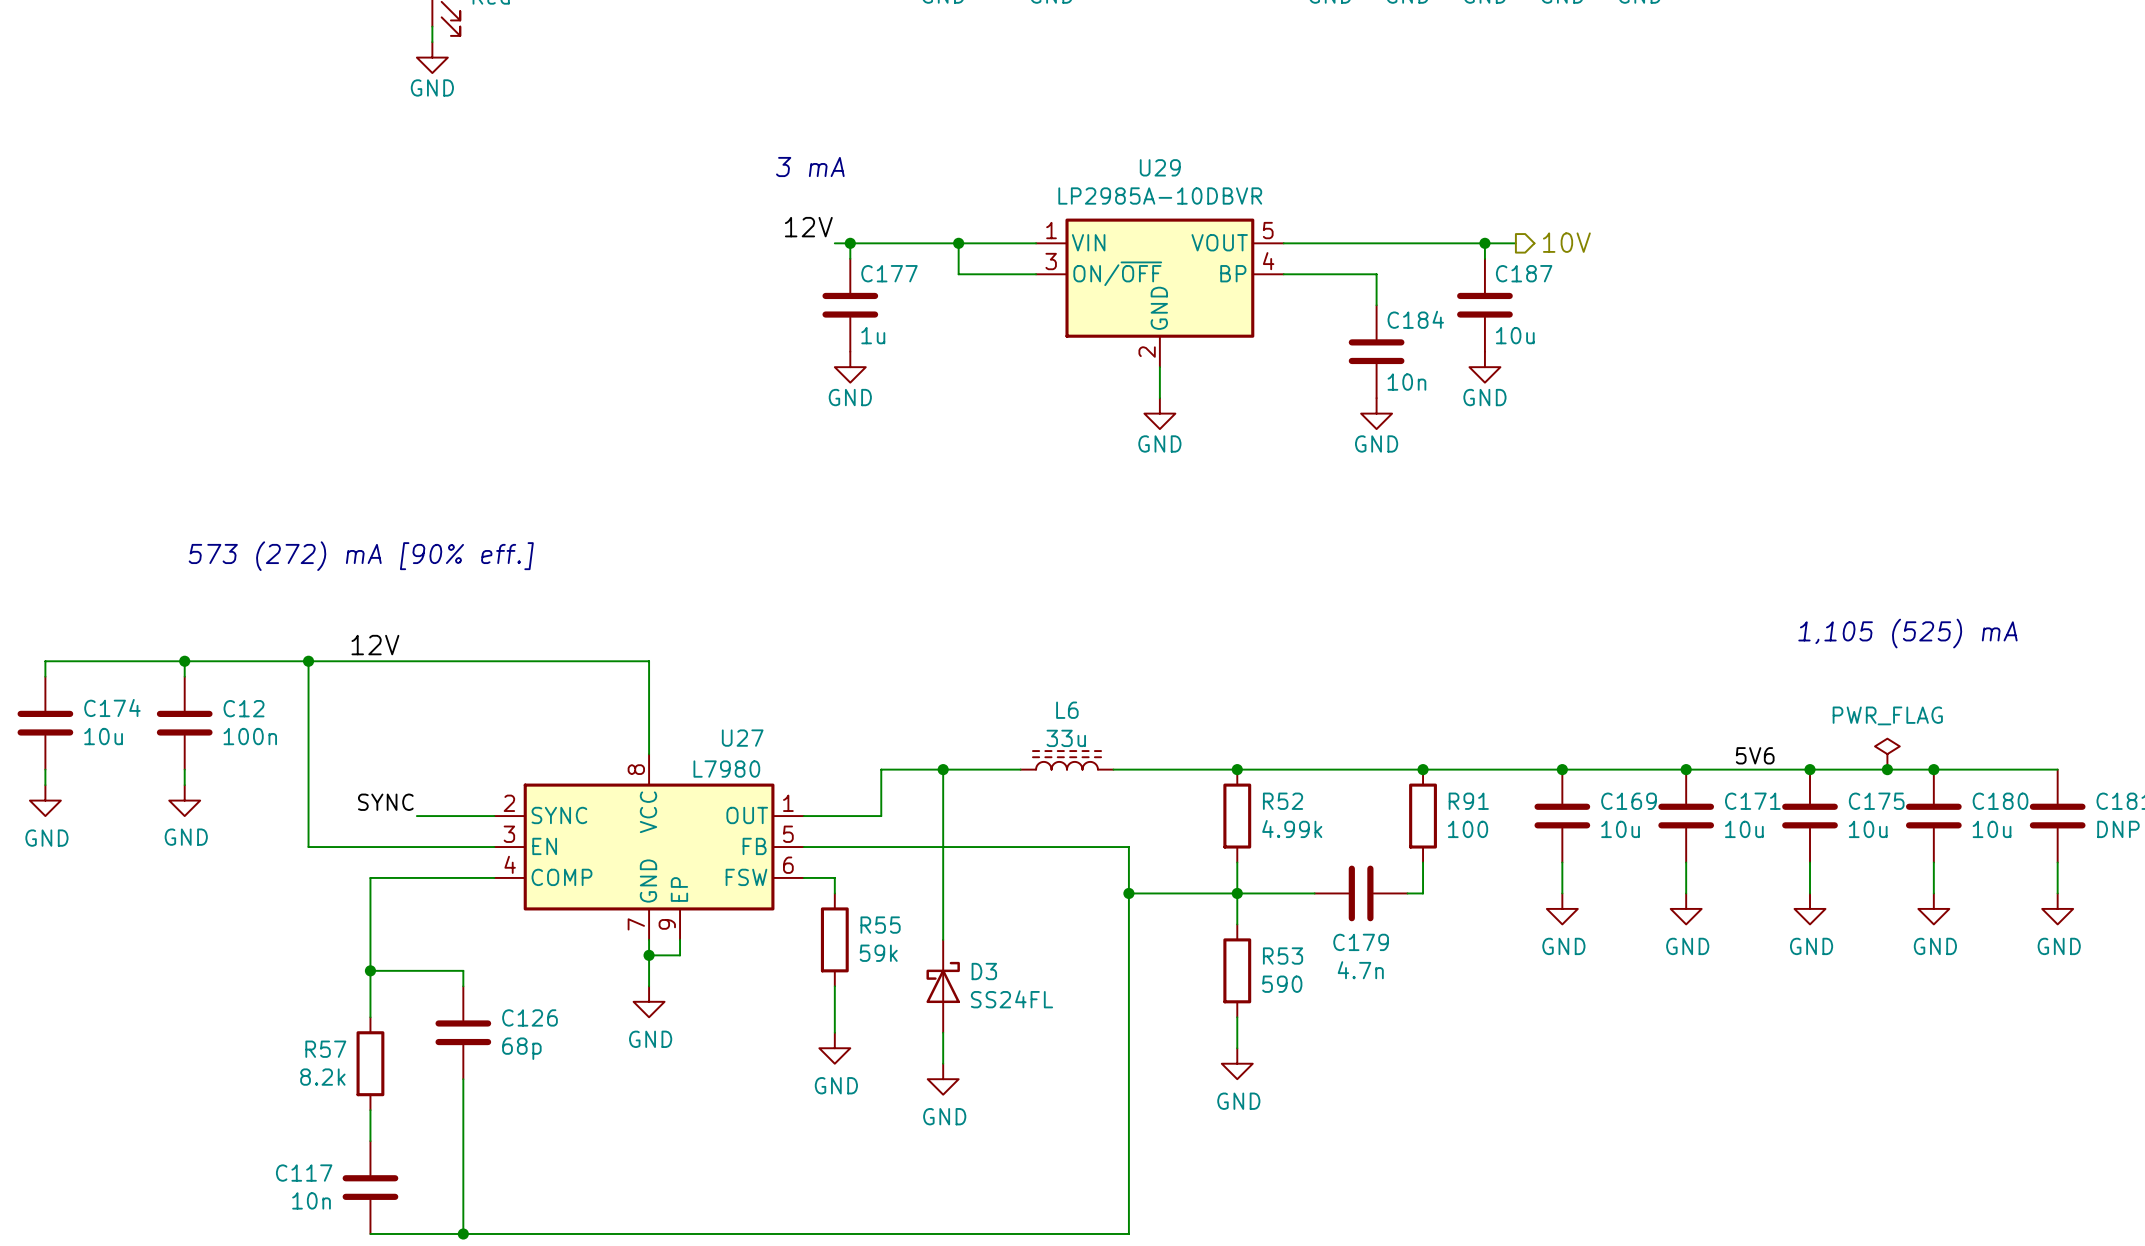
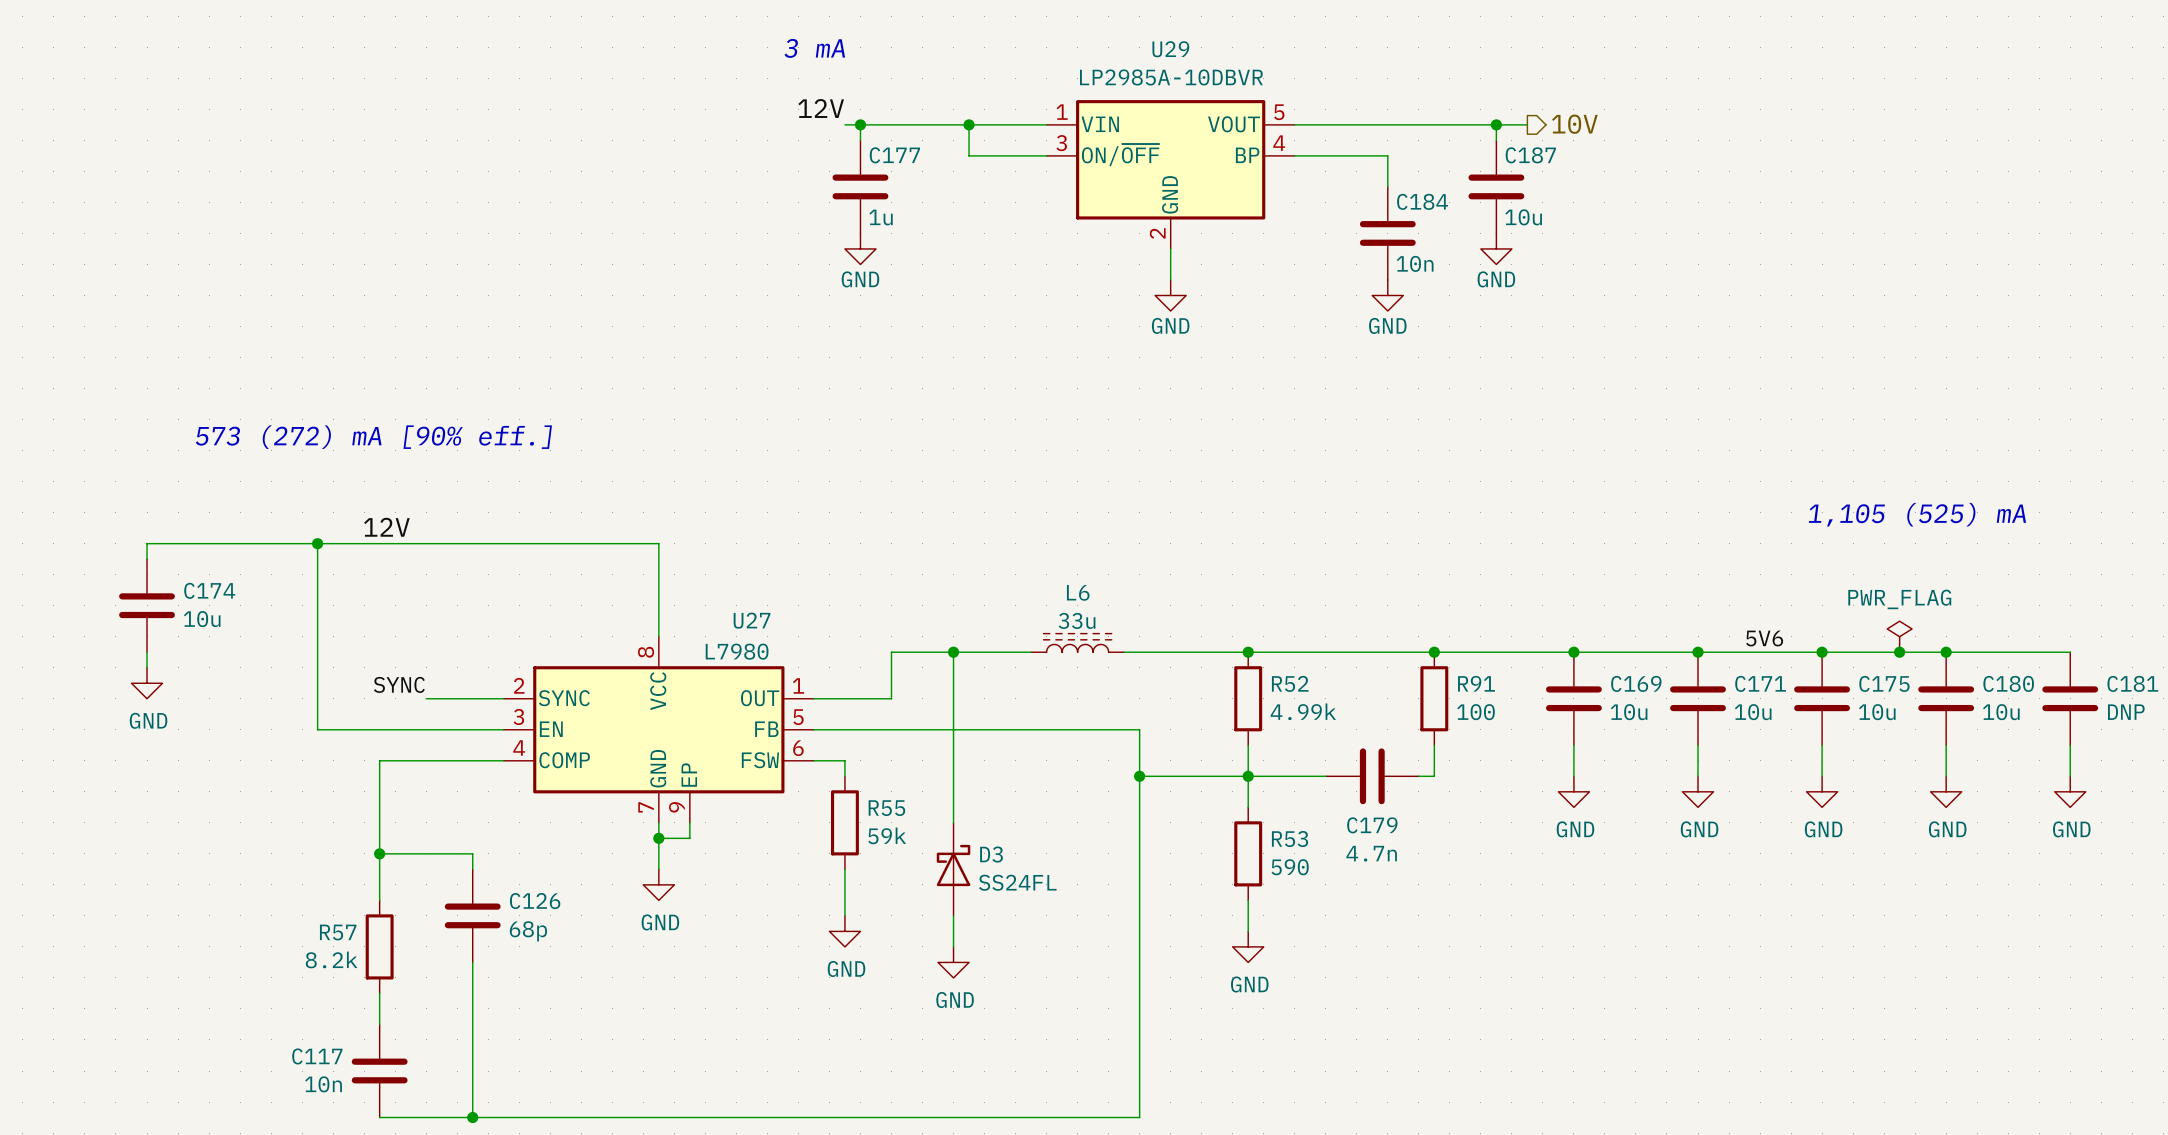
wire: (138, 661) (45, 661) (45, 676) -> (147, 543) (147, 559)
wire: (184, 661) (184, 676) -> none
junction: (184, 661) -> none
C174 position: (45, 723) -> (147, 605)
C12: 100n (184, 723) -> none
wire: (45, 769) (45, 785) -> none
wire: (184, 769) (184, 785) -> (147, 652) (147, 667)
power symbol: GND (45, 800) -> none
power symbol: none -> GND (147, 683)
power symbol: GND (184, 800) -> none

